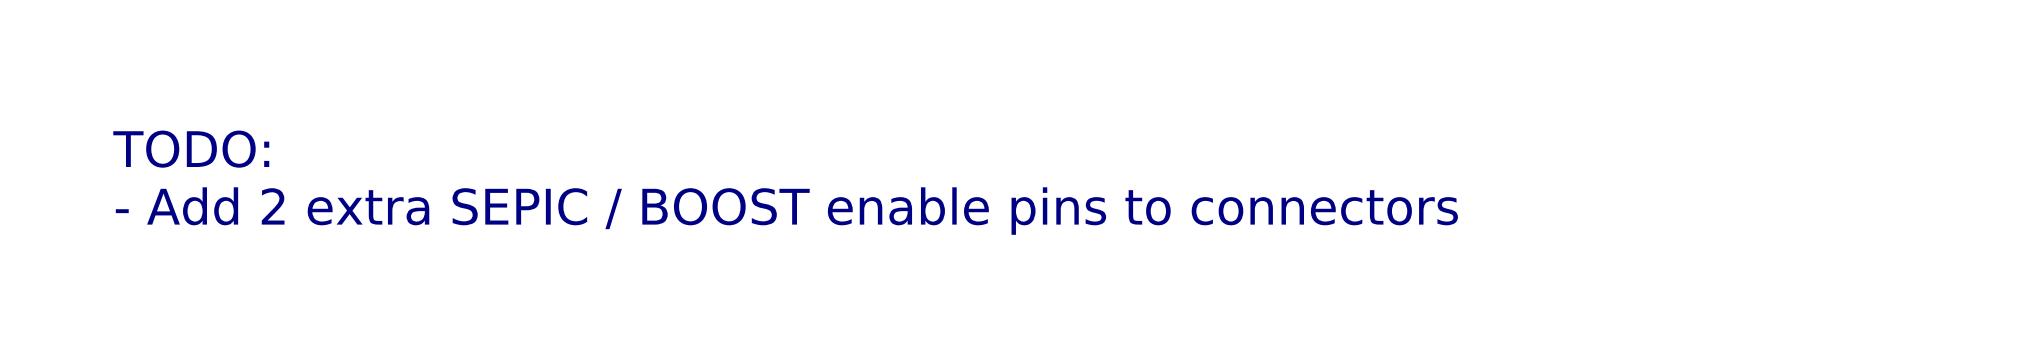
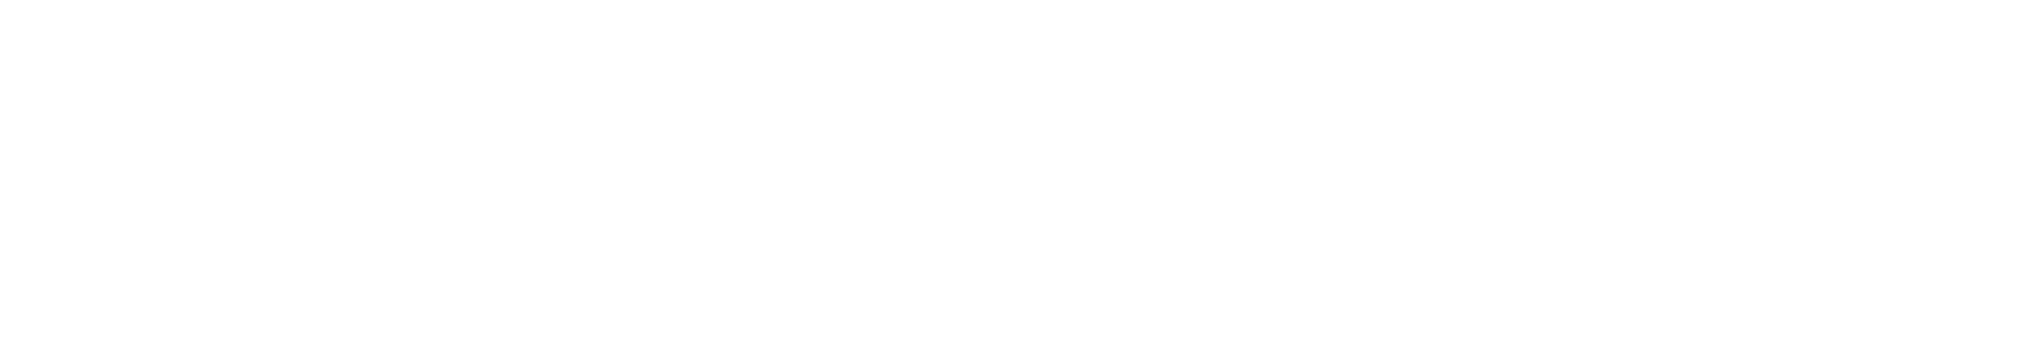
text: TODO: (191, 149) -> none
text: - Add 2 extra SEPIC / BOOST enable pins to connectors (786, 211) -> none

